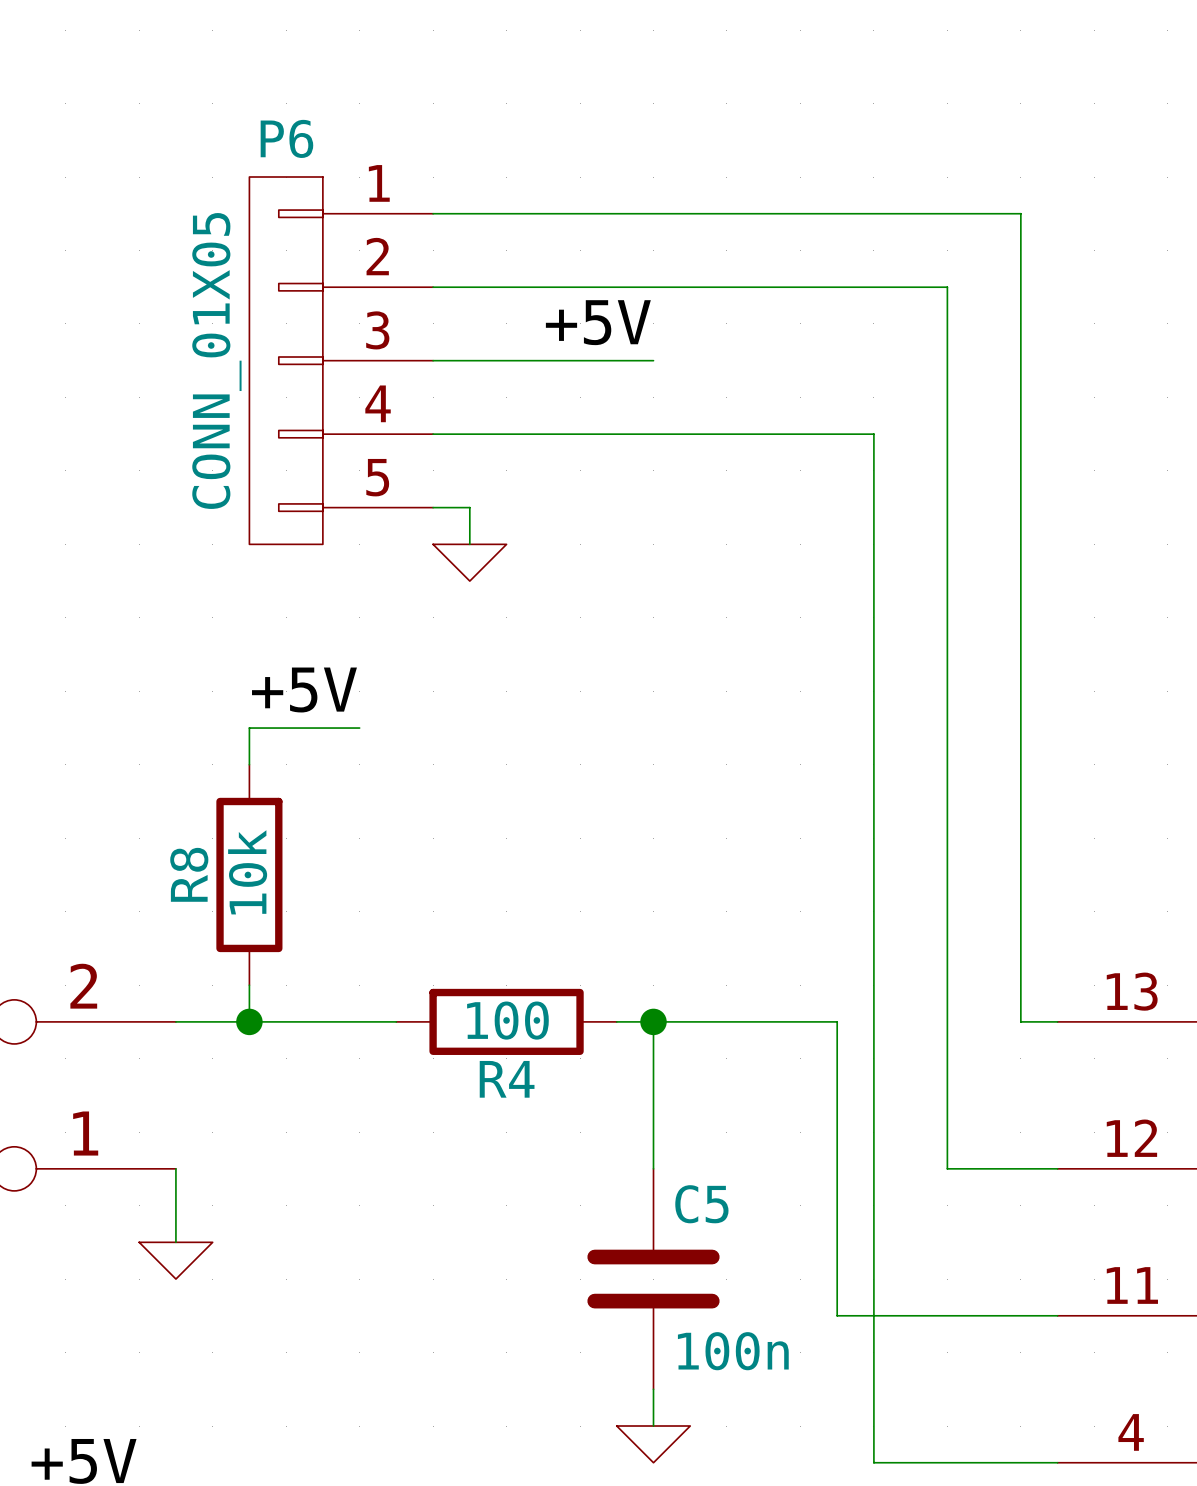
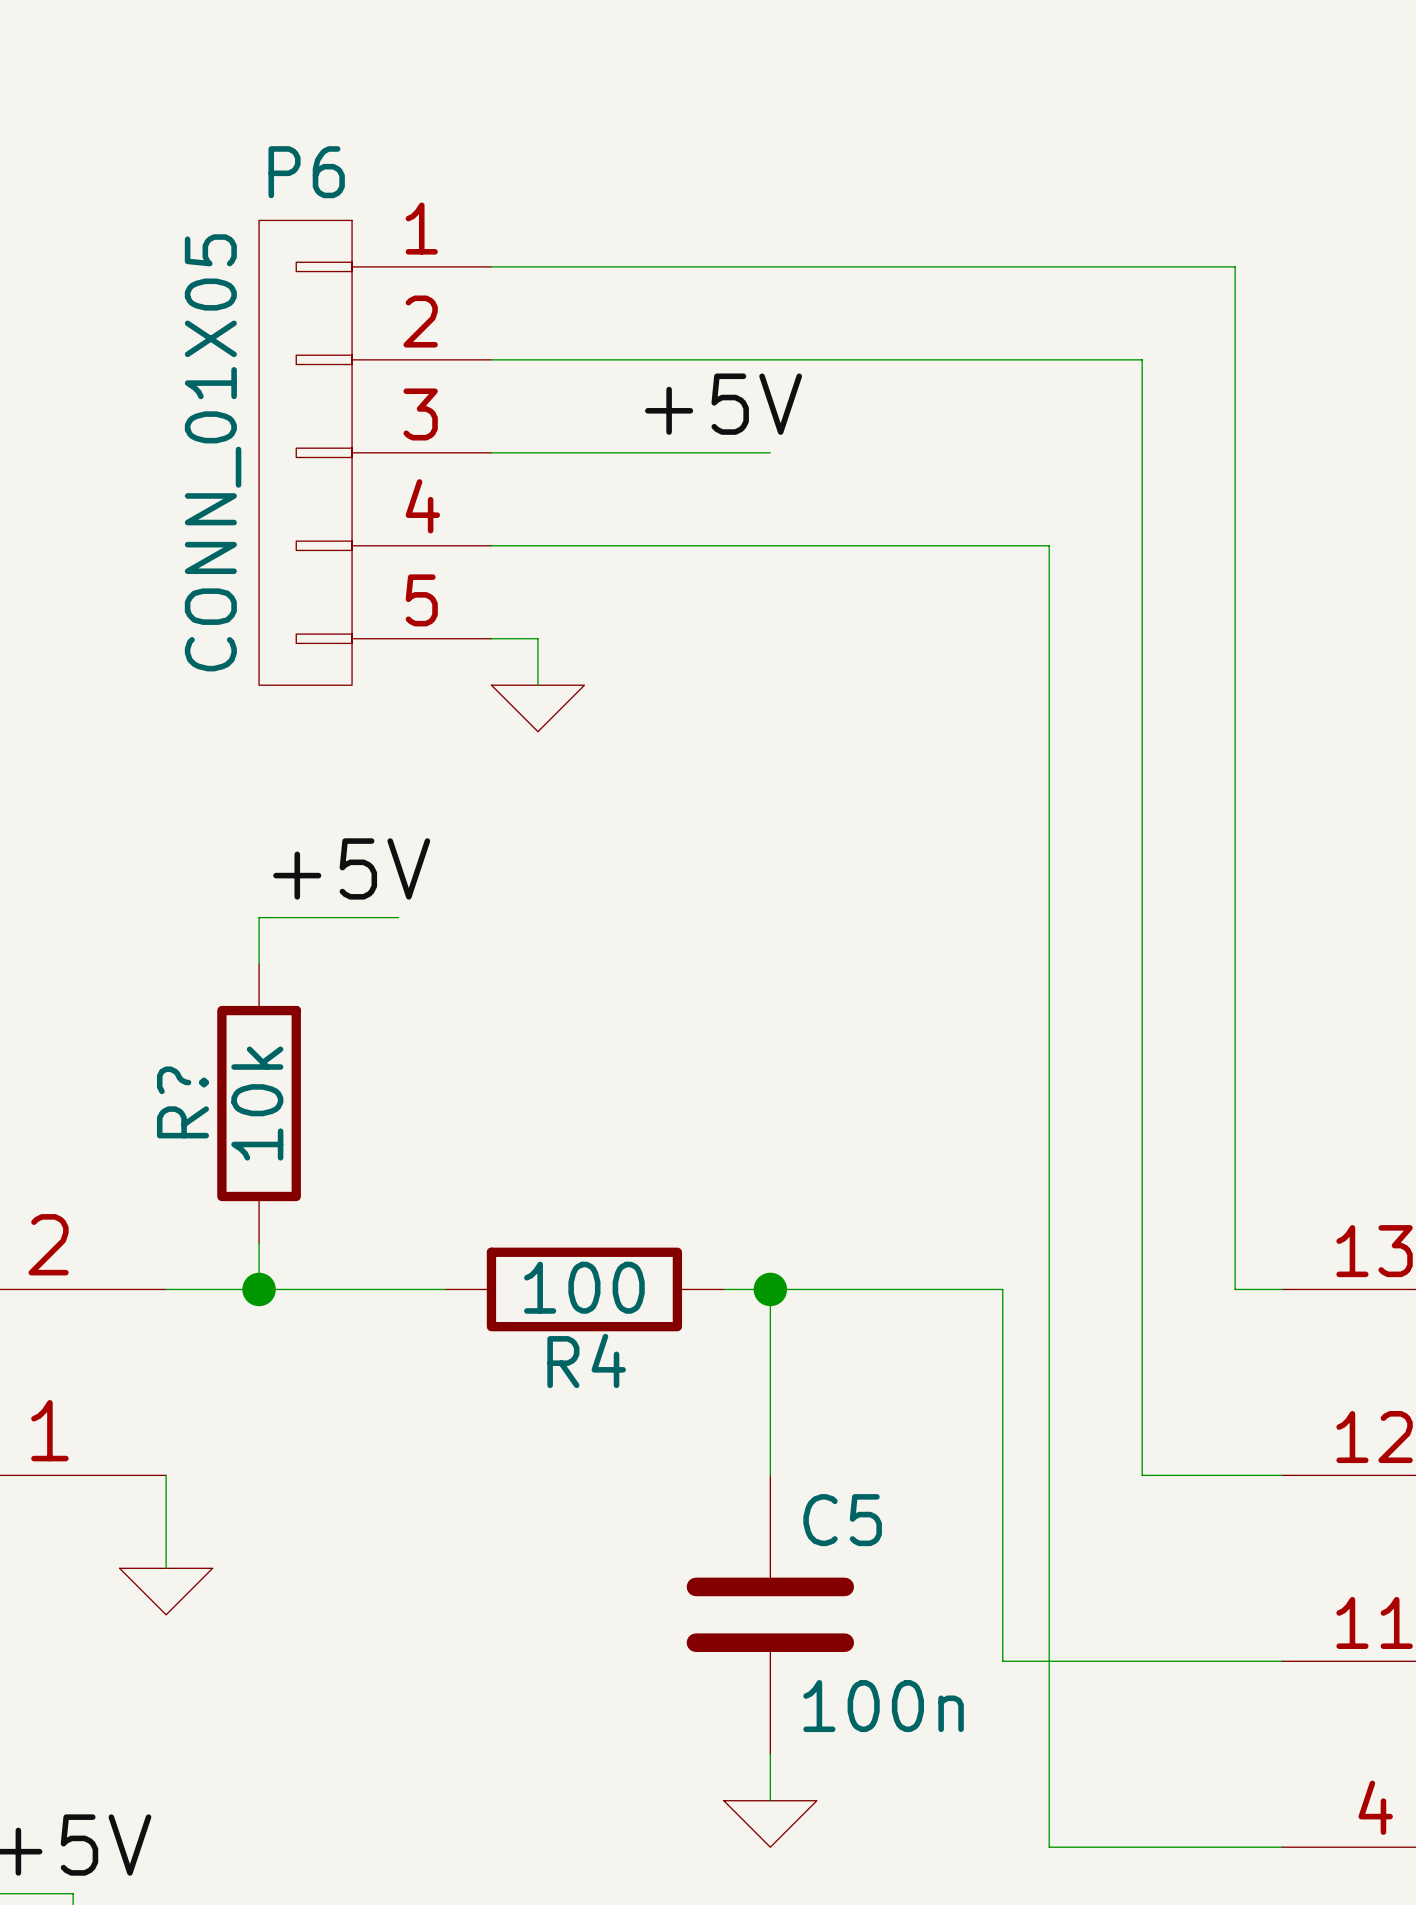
R8 name: R8 (189, 874) -> R? (182, 1102)

